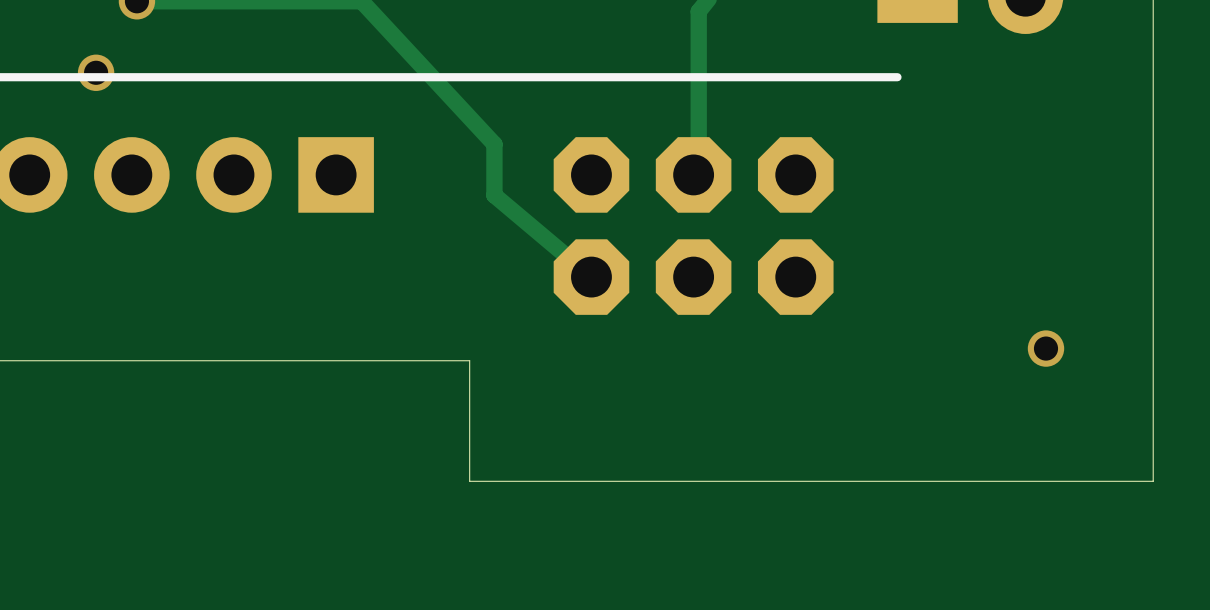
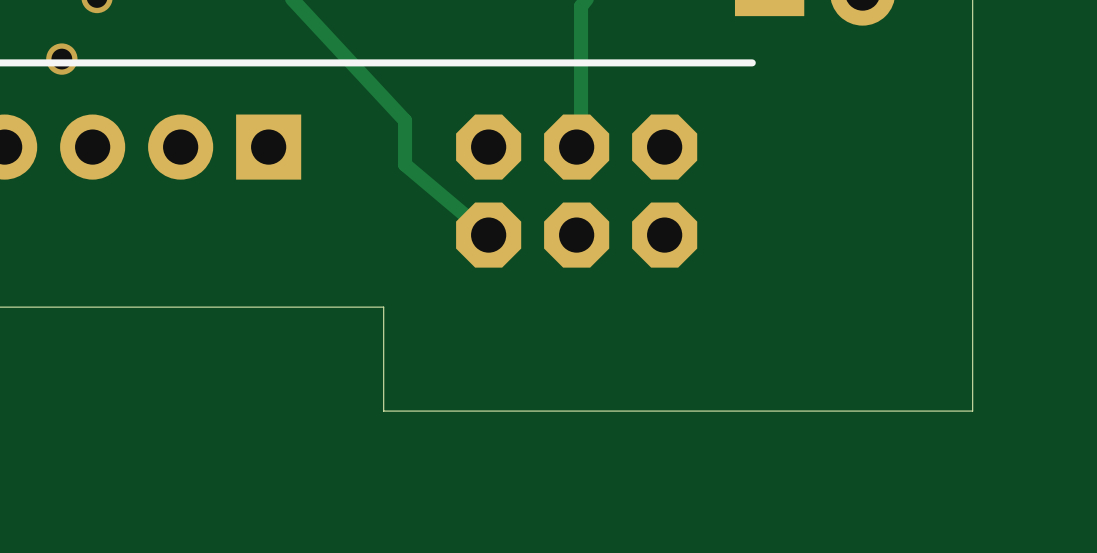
via: (1045, 348) -> none

